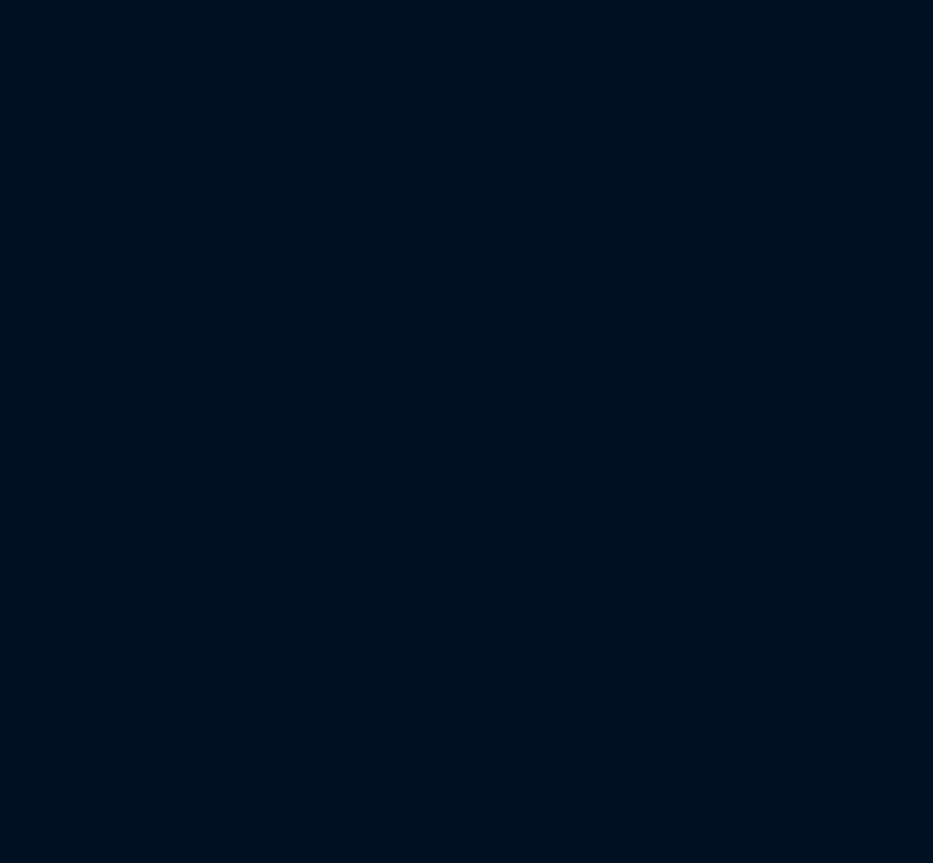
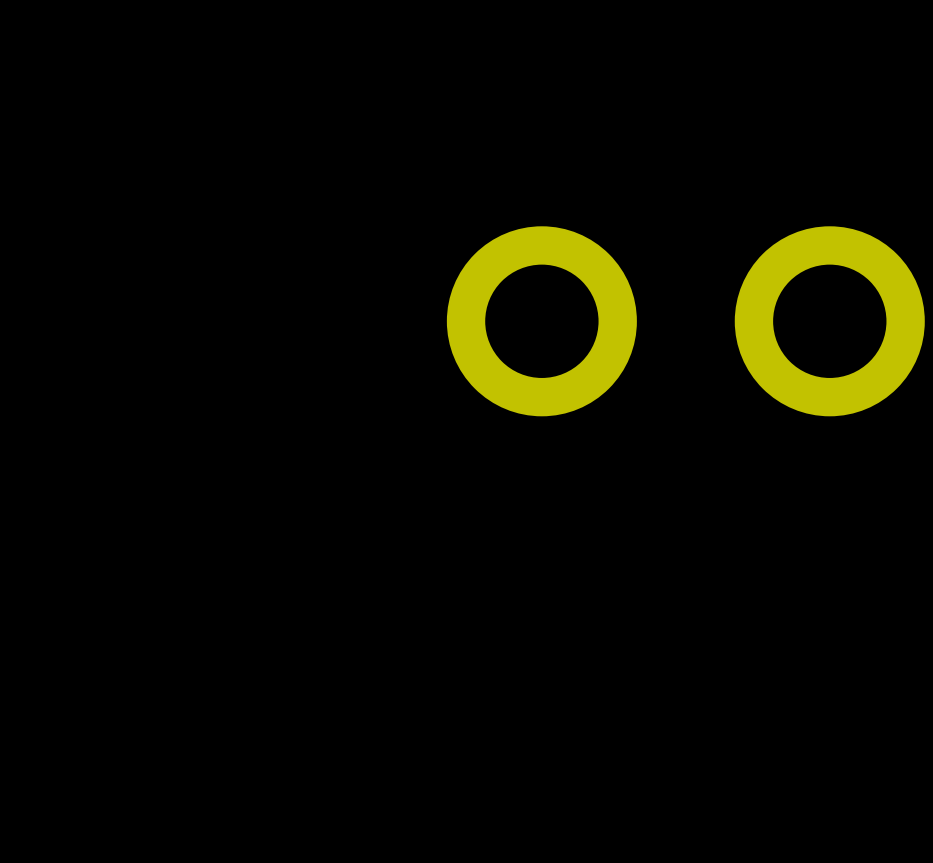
part: none -> (685, 321)

